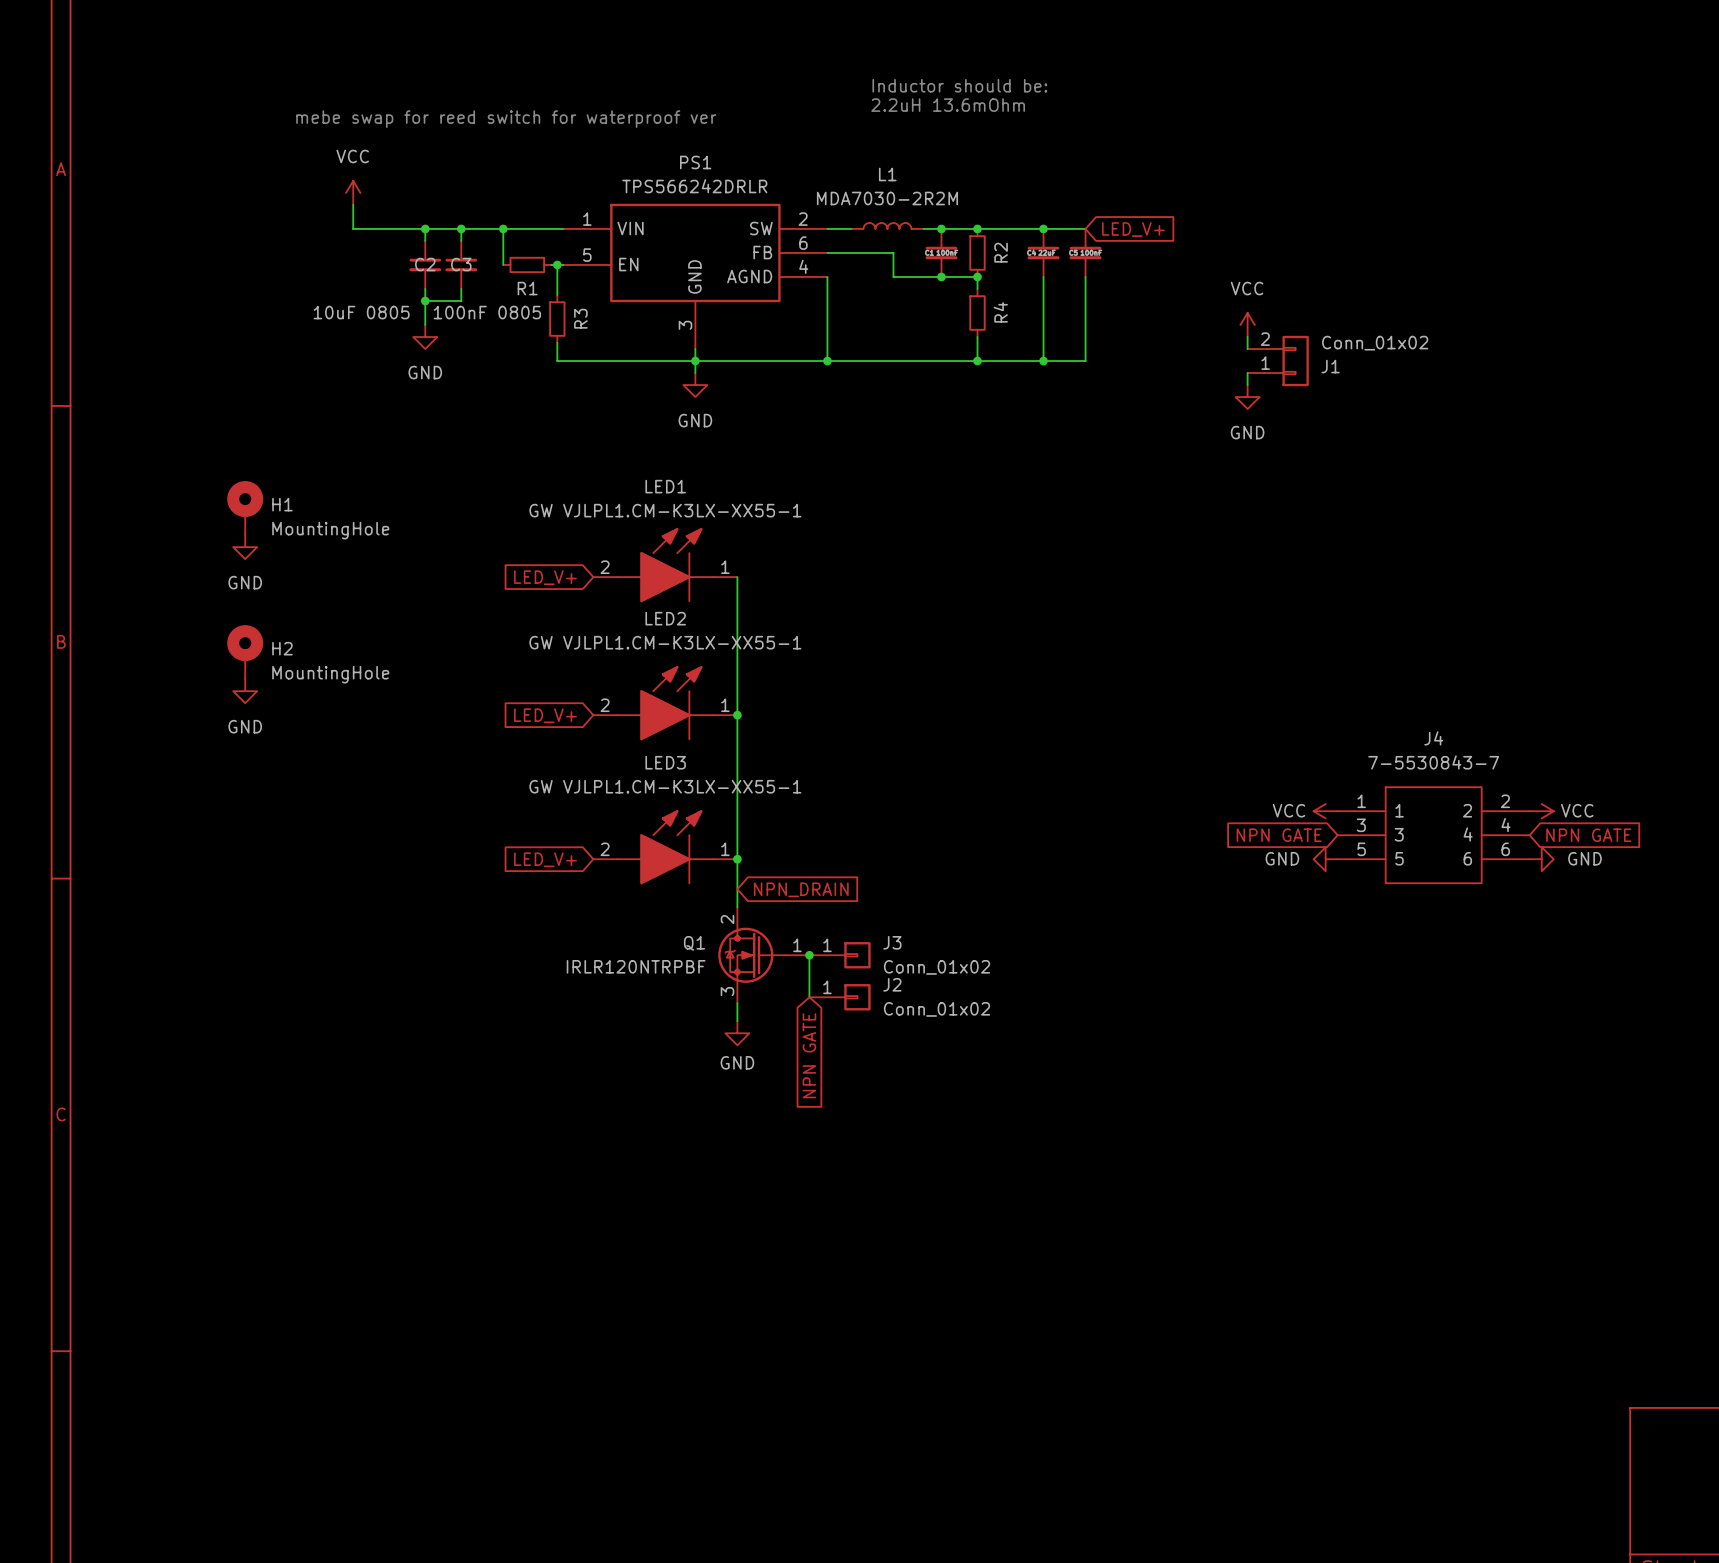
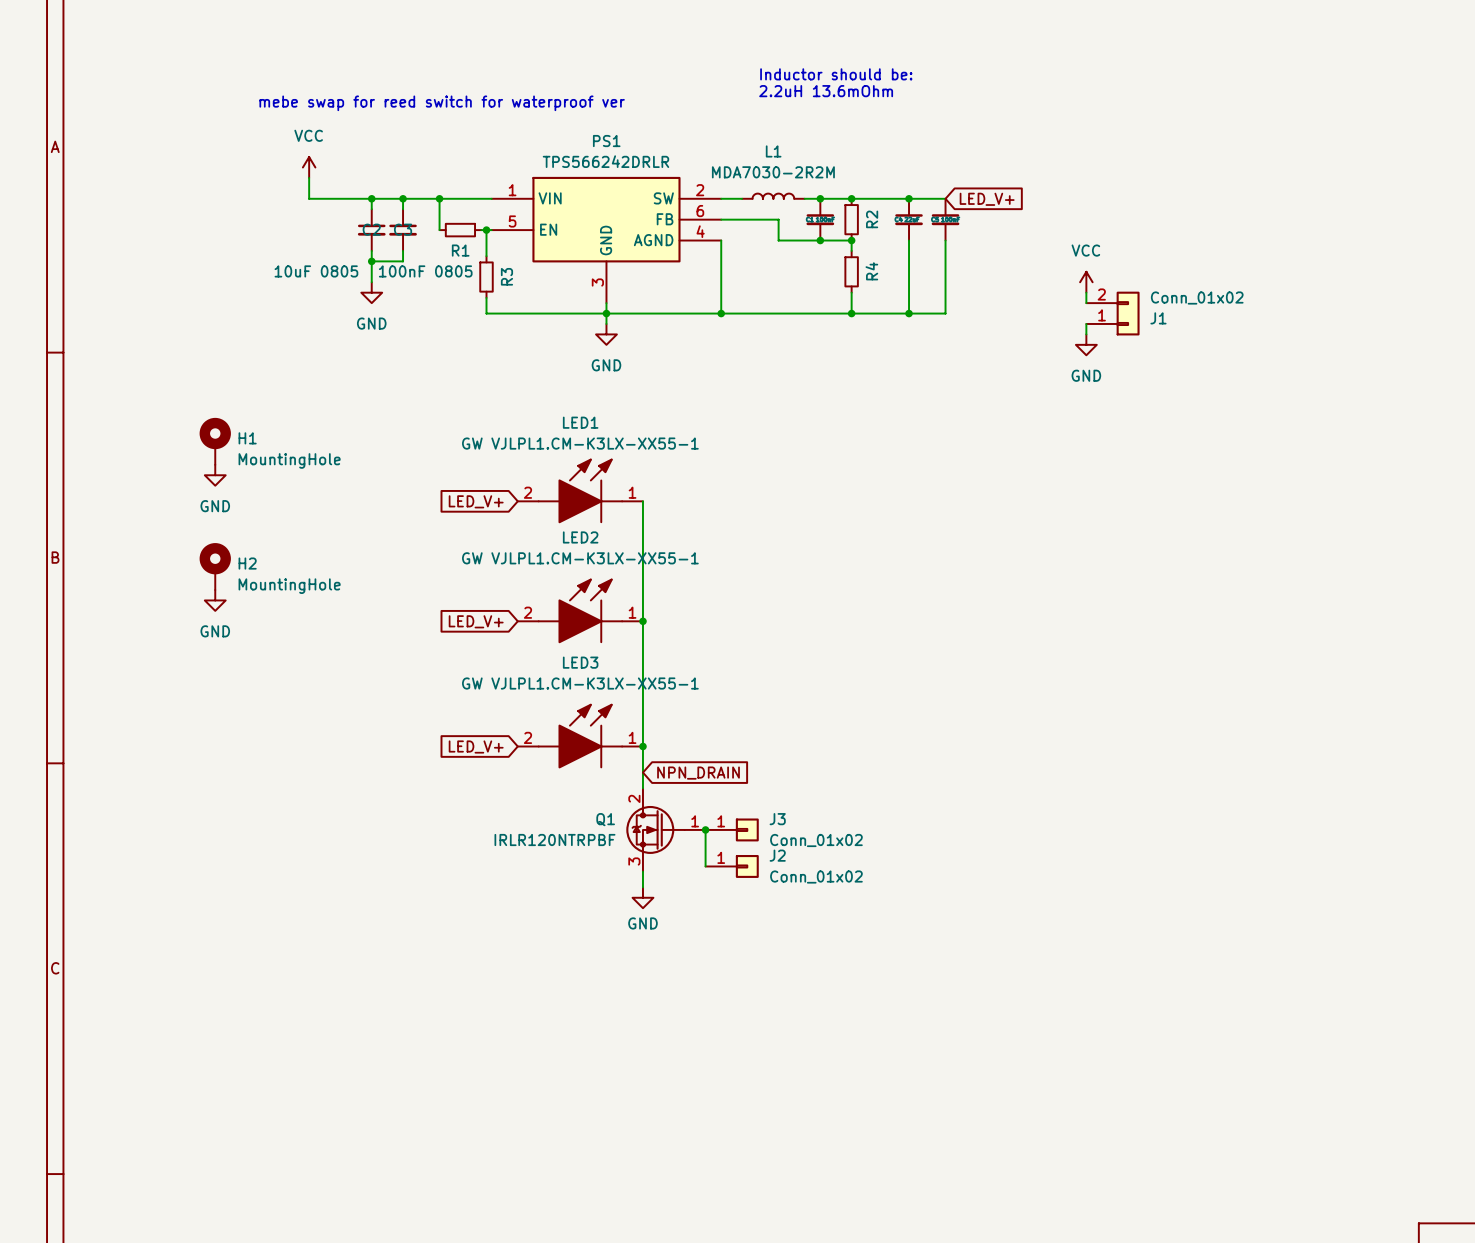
power symbol: VCC (1325, 811) -> none
power symbol: VCC (1541, 811) -> none
global label: NPN GATE (1279, 835) -> none
J4: 7-5530843-7 (1433, 835) -> none
global label: NPN GATE (1588, 835) -> none
power symbol: GND (1325, 859) -> none
power symbol: GND (1541, 859) -> none
global label: NPN GATE (809, 1055) -> none

